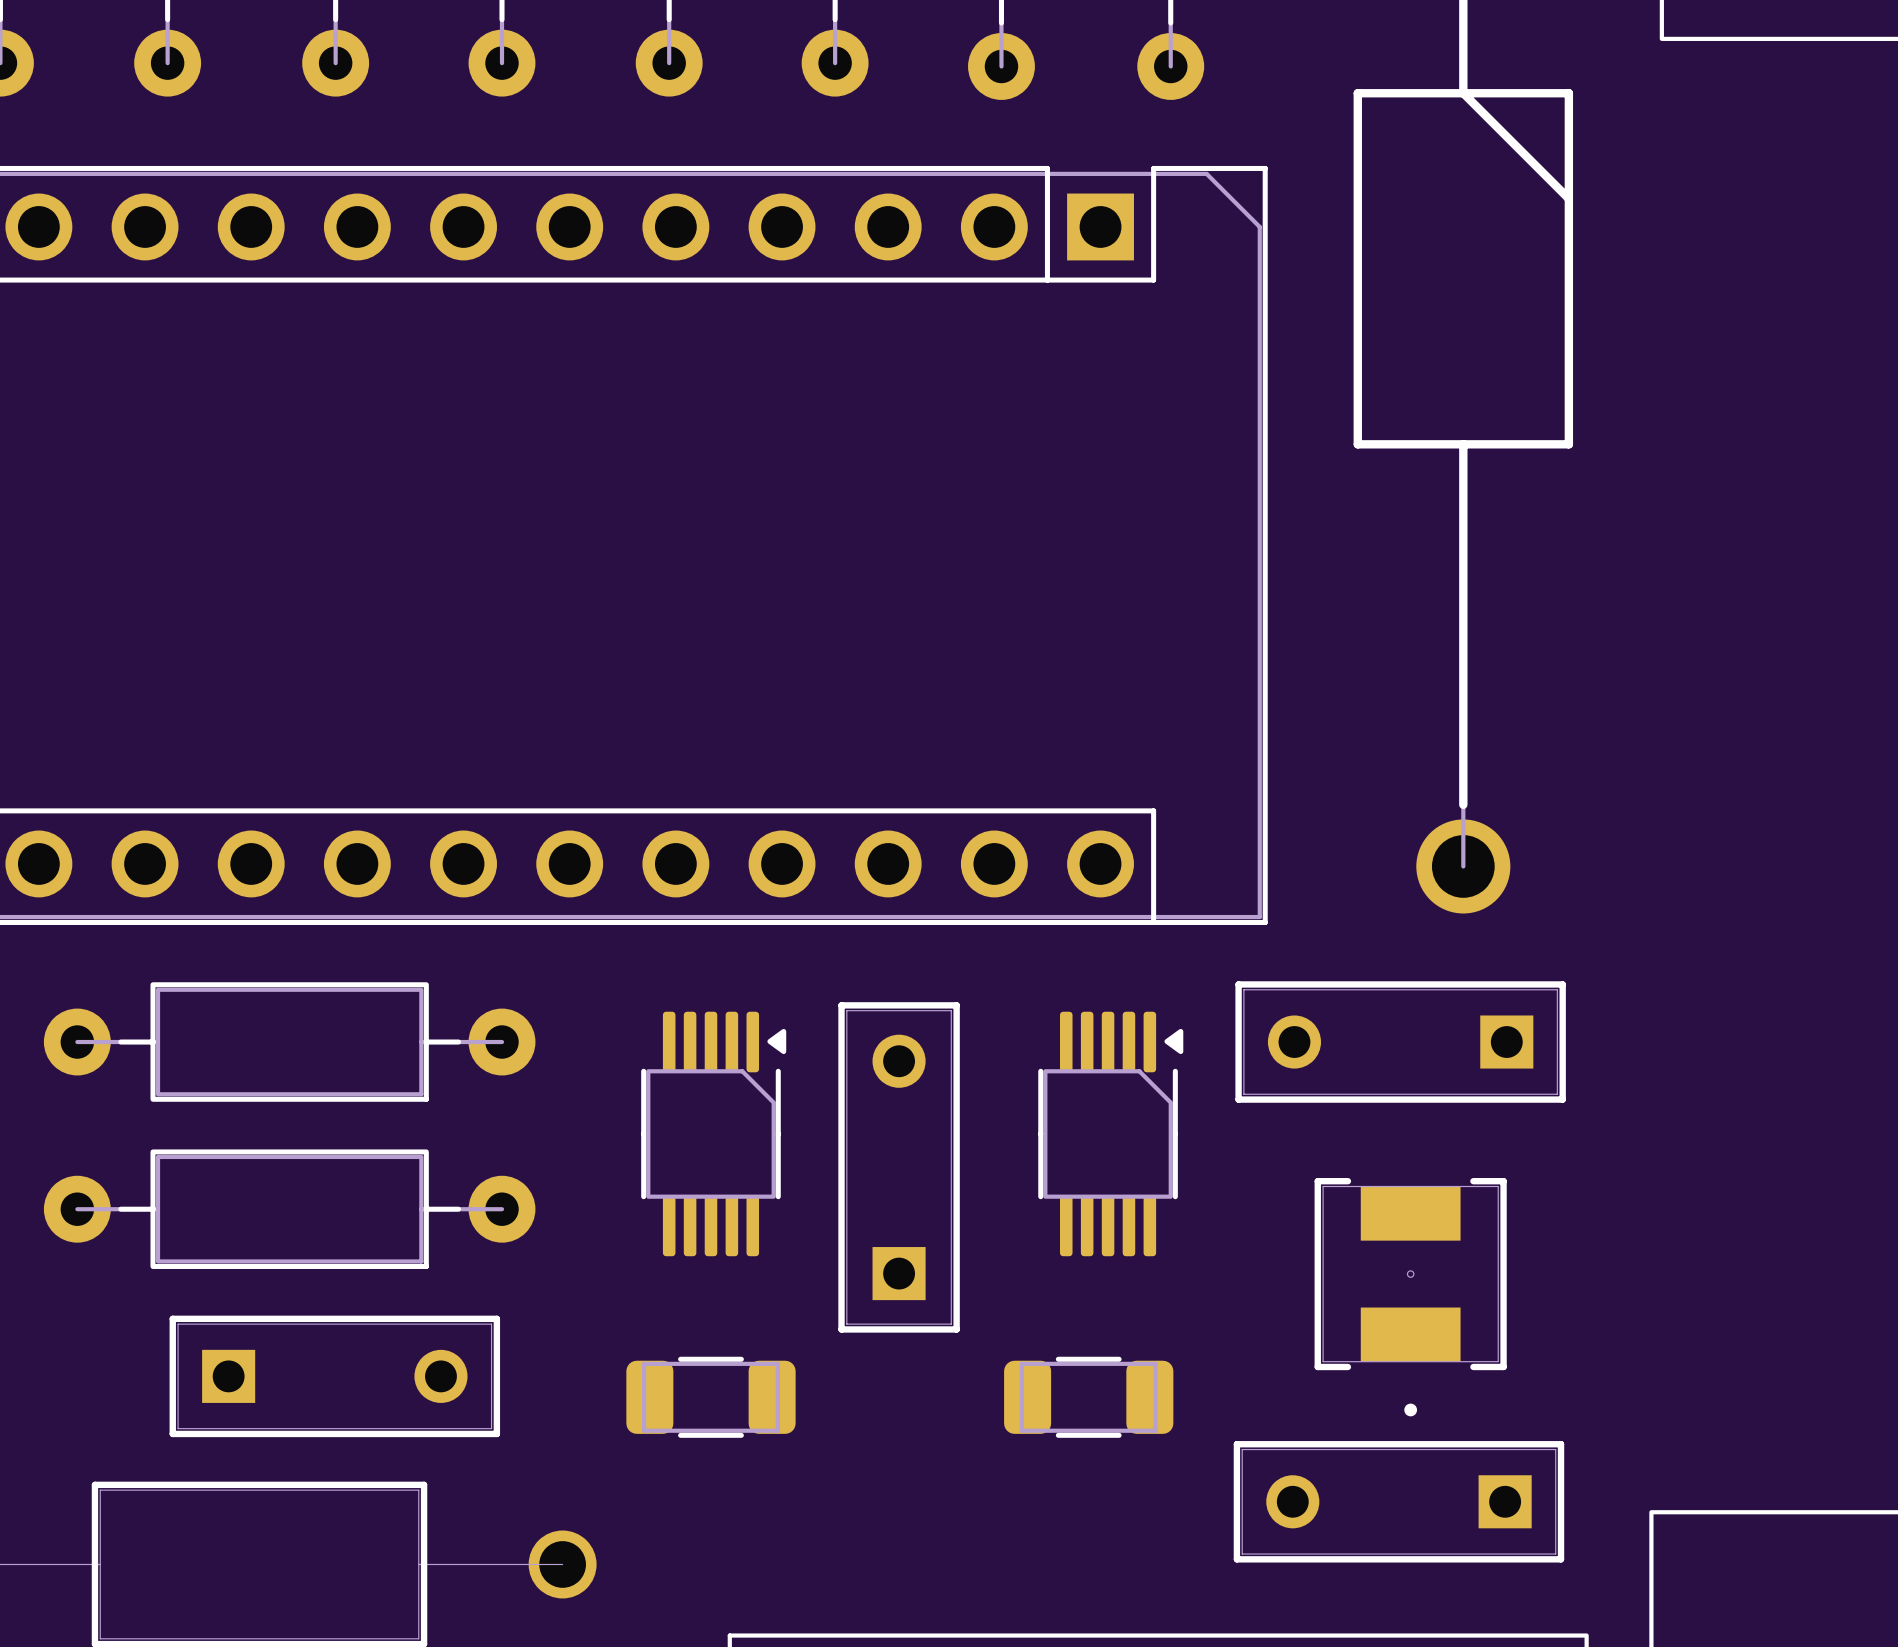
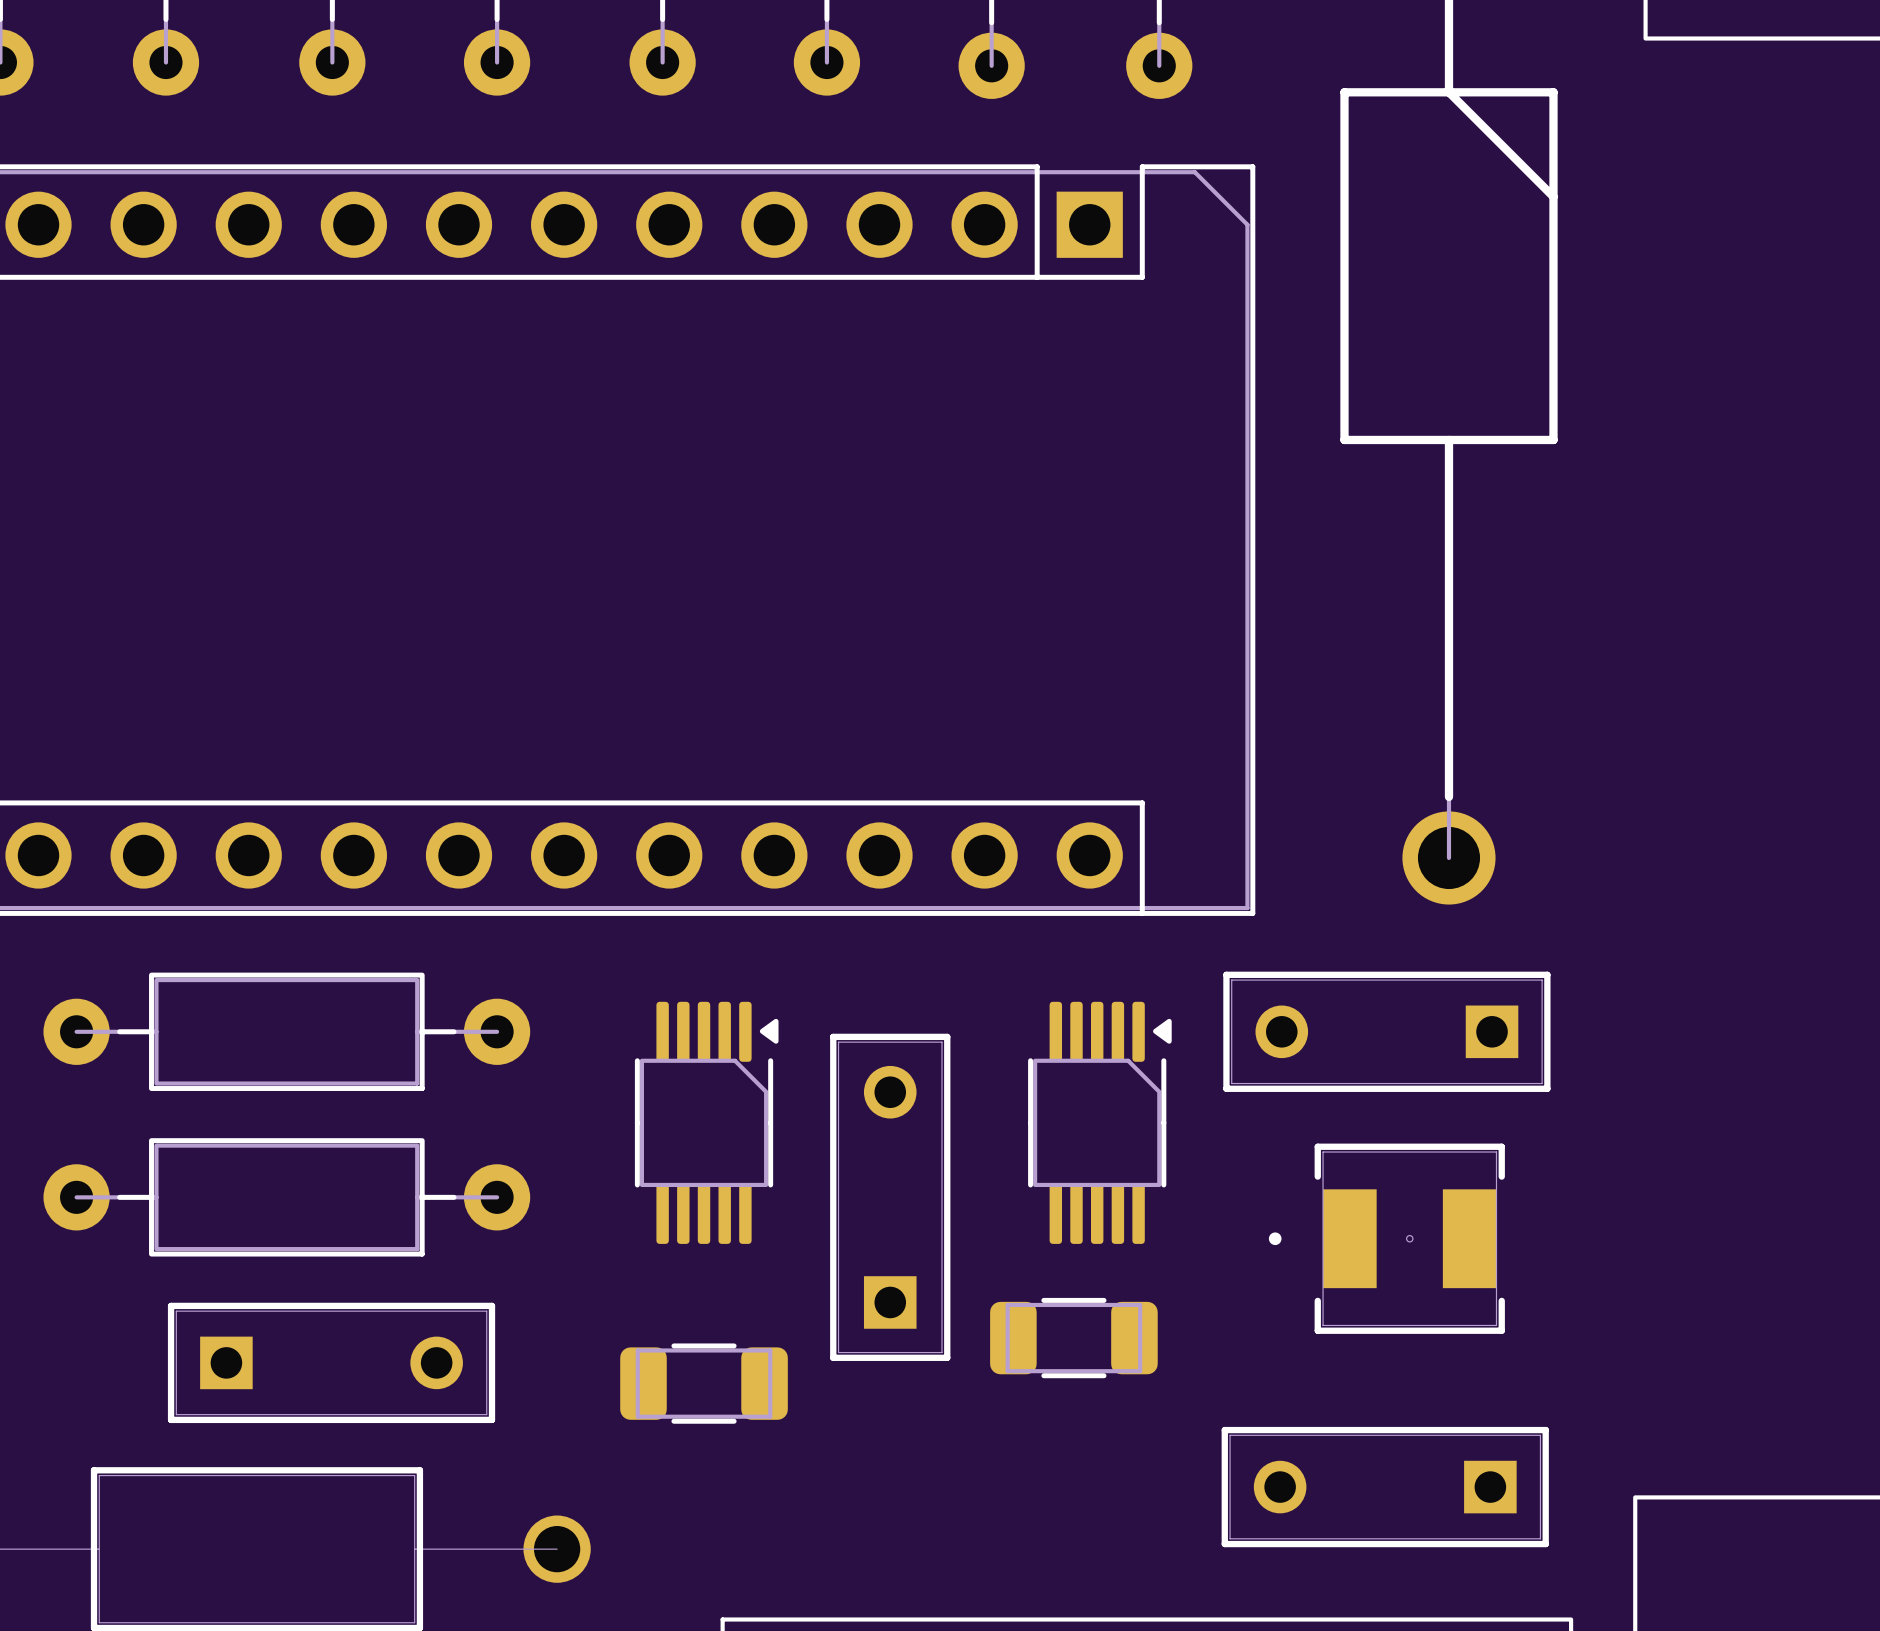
part position: (899, 1167) -> (890, 1197)
part rotation: 0° (1410, 1297) -> 90° clockwise (1386, 1238)
part position: (1088, 1397) -> (1073, 1338)

